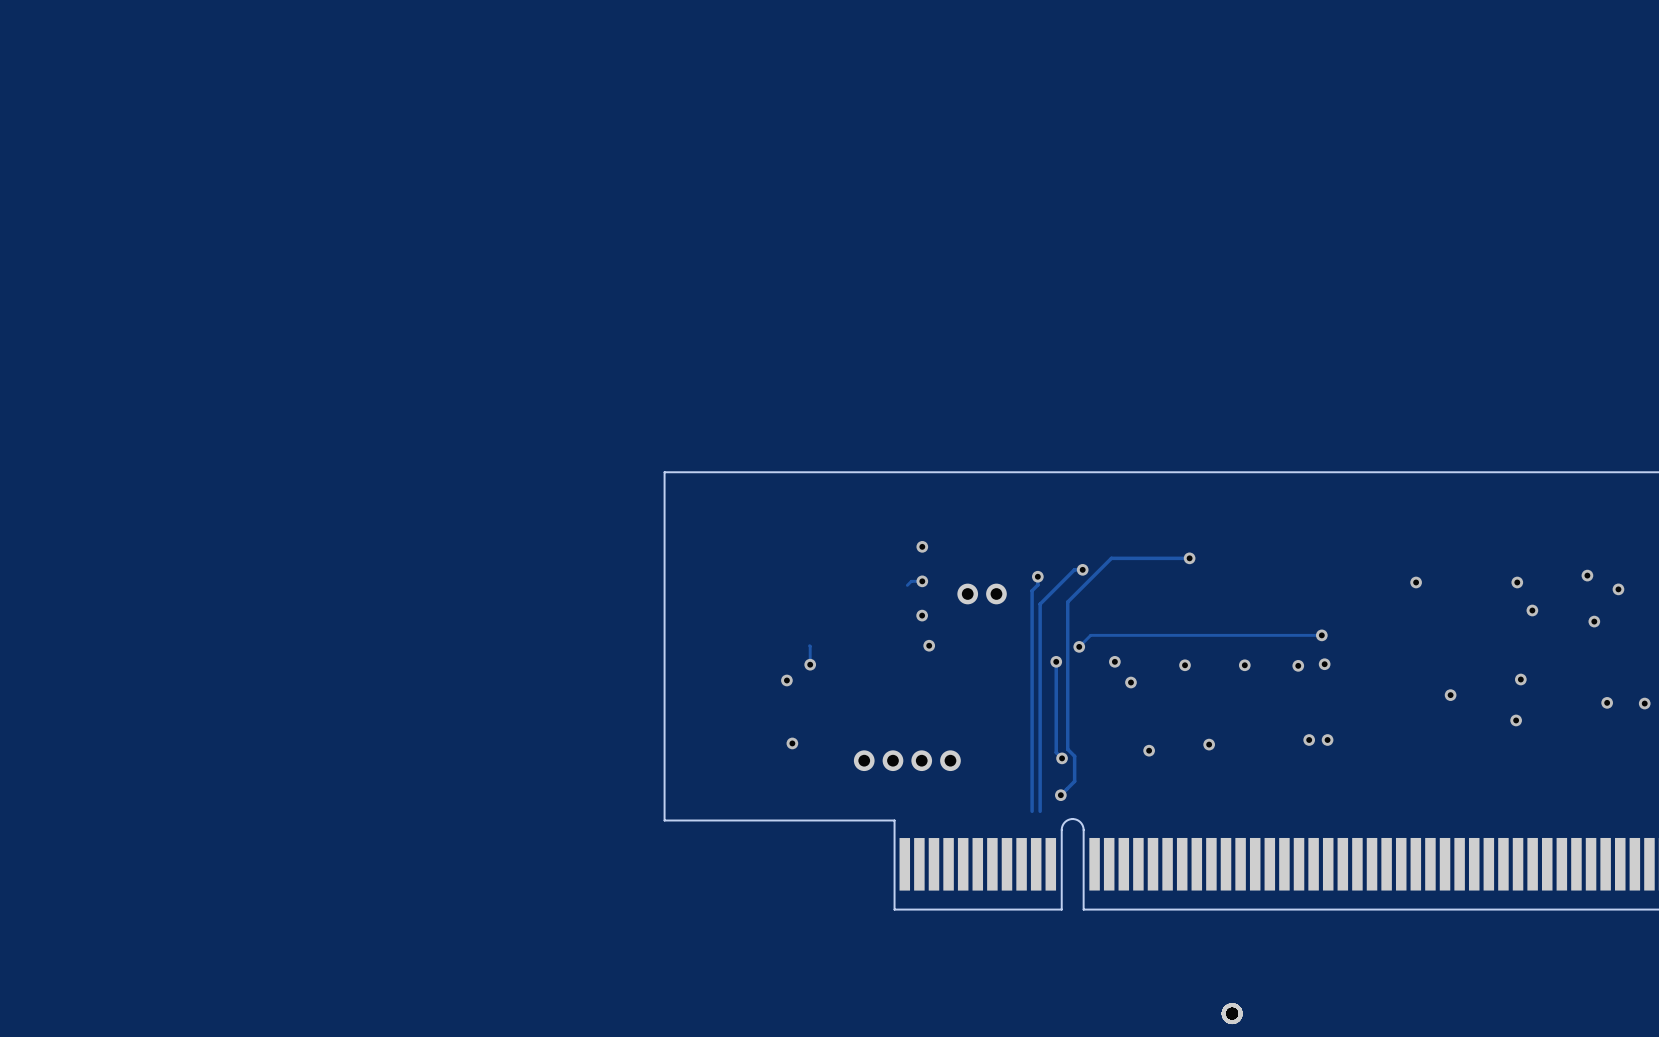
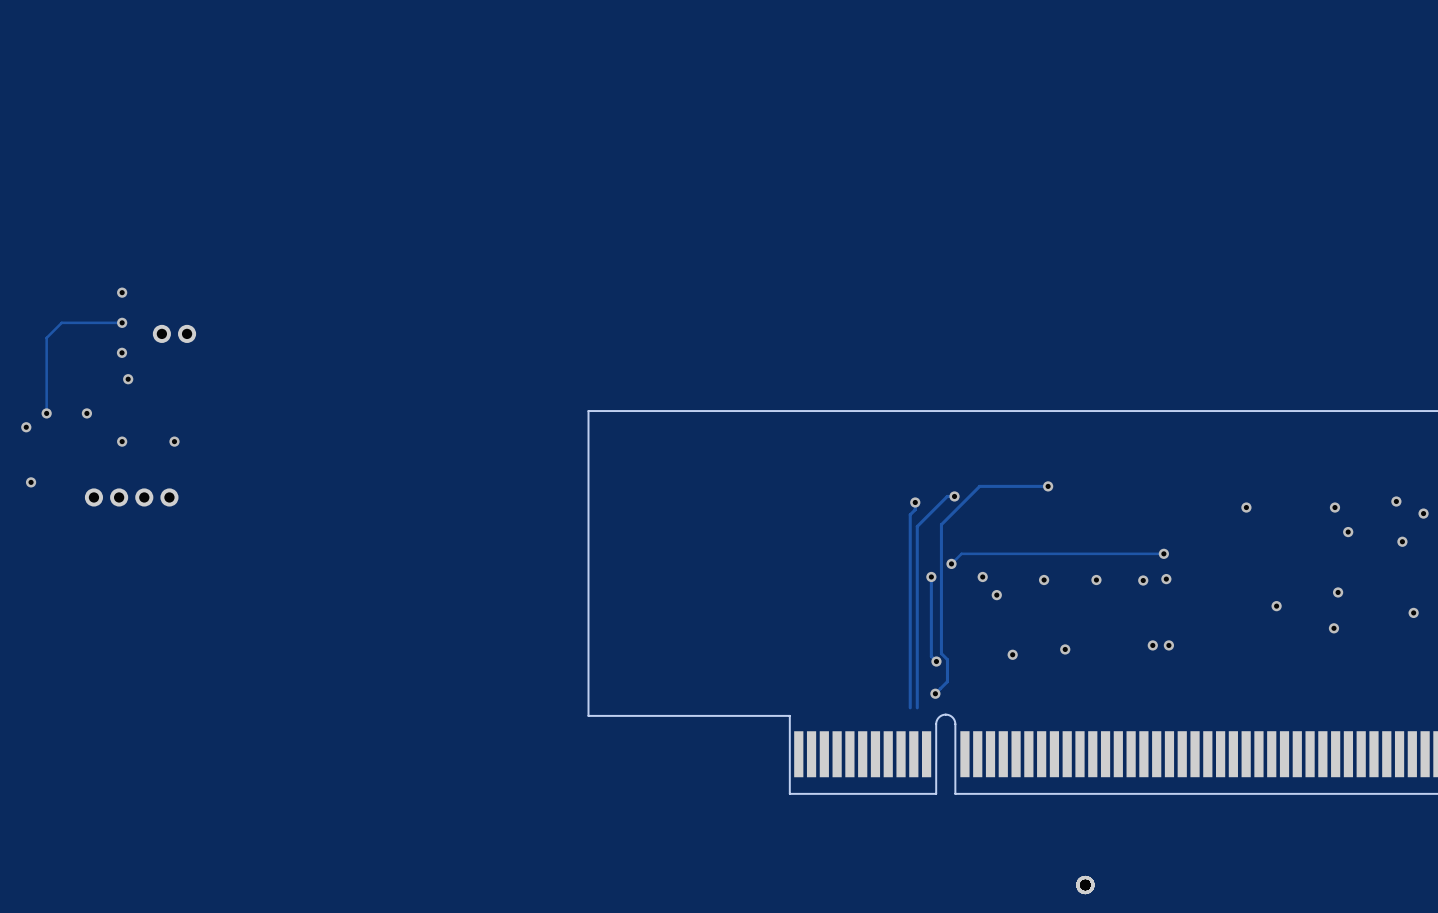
via: none -> (122, 292)
track: none -> (122, 322) (61, 322) (46, 337) (46, 413)
via: none -> (122, 322)
part: none -> (161, 333)
part: none -> (187, 333)
via: none -> (122, 352)
via: none -> (128, 379)
via: none -> (46, 413)
via: none -> (86, 413)
via: none -> (26, 427)
via: none -> (122, 441)
via: none -> (174, 441)
via: (922, 546) -> none
via: none -> (31, 482)
part: none -> (93, 497)
part: none -> (119, 497)
part: none -> (144, 497)
part: none -> (169, 497)
track: (922, 581) (911, 581) (907, 585) -> none
via: (922, 581) -> none
part: (967, 593) -> none
part: (996, 593) -> none
via: (922, 615) -> none
track: (809, 645) (810, 664) -> none
via: (929, 645) -> none
via: (810, 664) -> none
via: (786, 680) -> none
via: (792, 743) -> none
part: (864, 760) -> none
part: (892, 760) -> none
part: (921, 760) -> none
part: (950, 760) -> none

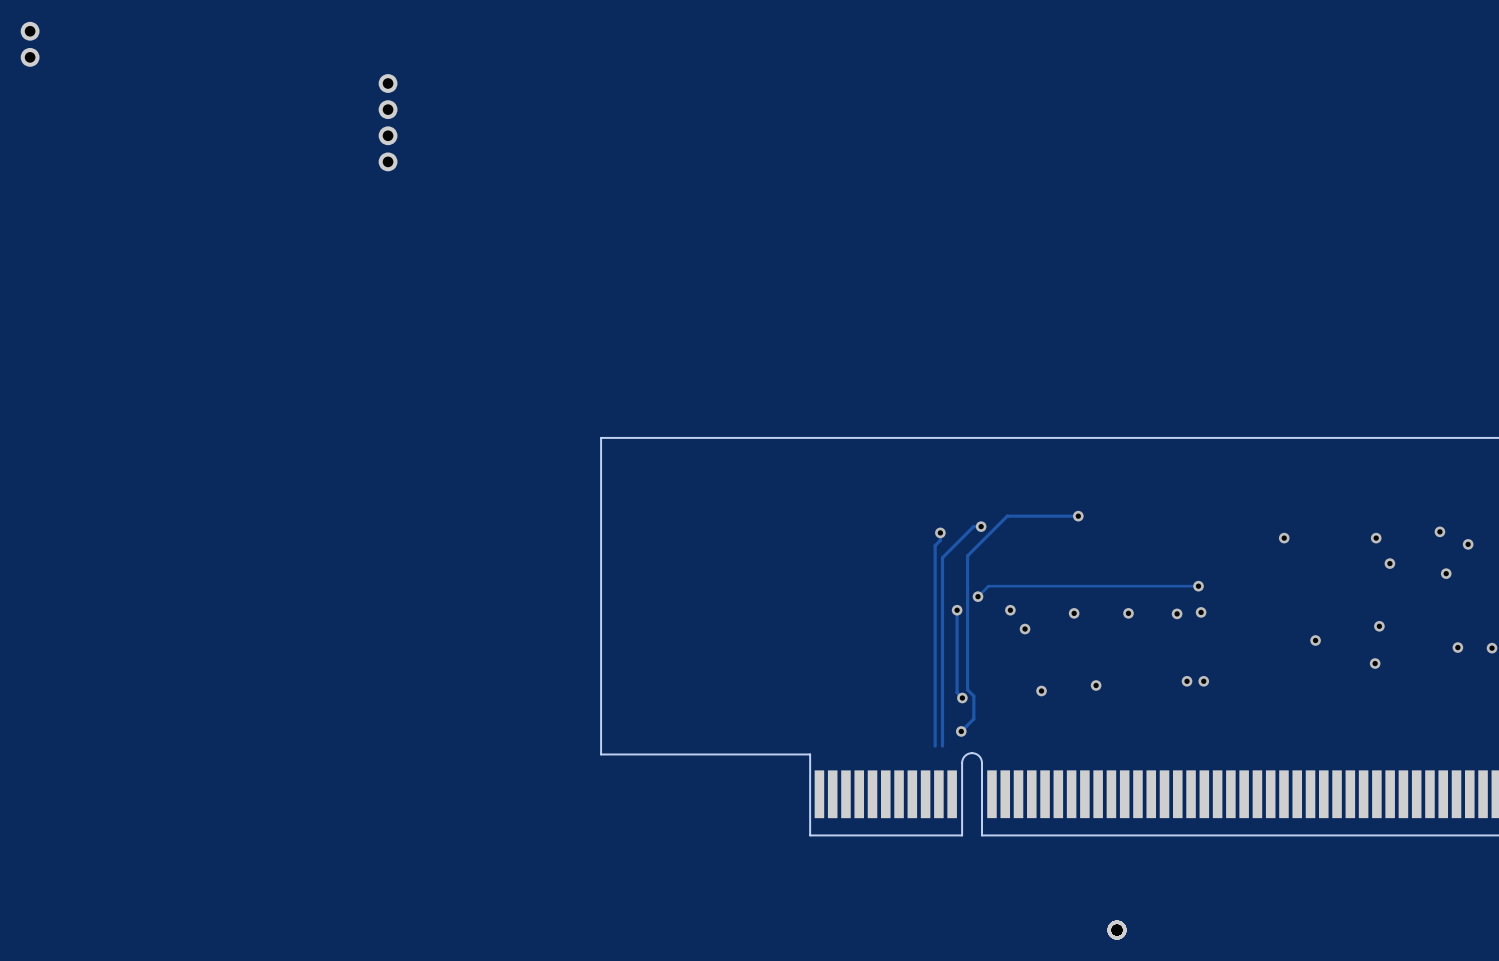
part: none -> (30, 31)
part: none -> (30, 57)
part: none -> (388, 83)
part: none -> (388, 109)
part: none -> (388, 135)
part: none -> (388, 161)
via: (122, 292) -> none
track: (122, 322) (61, 322) (46, 337) (46, 413) -> none
via: (122, 322) -> none
part: (161, 333) -> none
part: (187, 333) -> none
via: (122, 352) -> none
via: (128, 379) -> none
via: (46, 413) -> none
via: (86, 413) -> none
via: (26, 427) -> none
via: (122, 441) -> none
via: (174, 441) -> none
via: (31, 482) -> none
part: (93, 497) -> none
part: (119, 497) -> none
part: (144, 497) -> none
part: (169, 497) -> none

